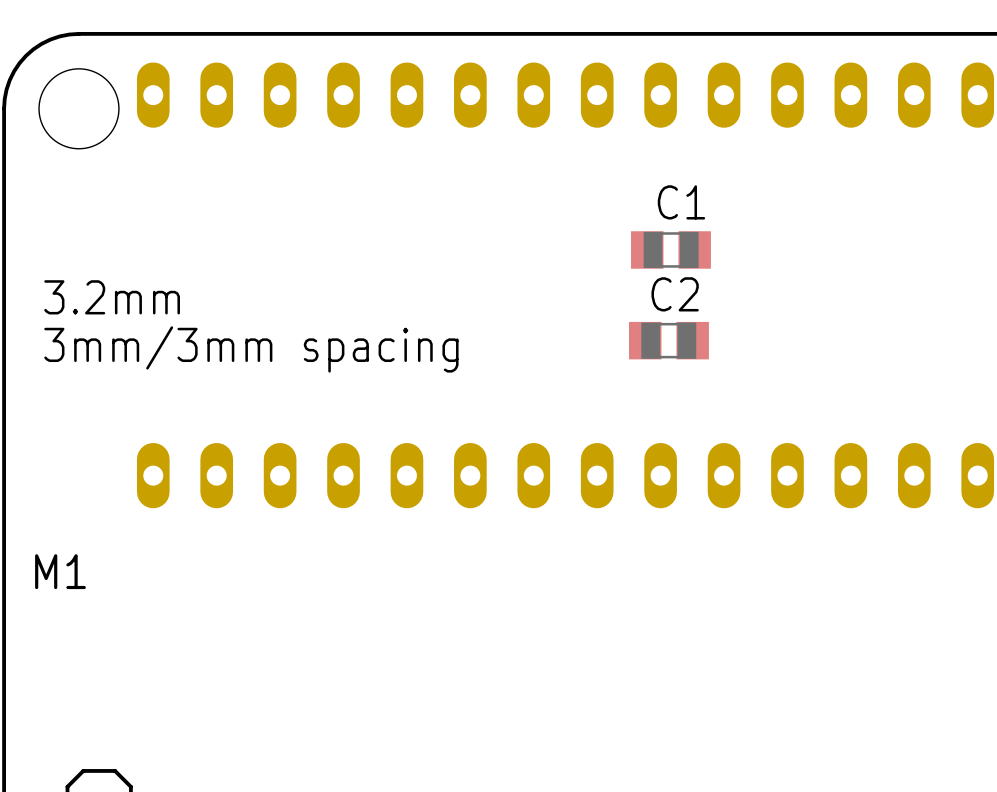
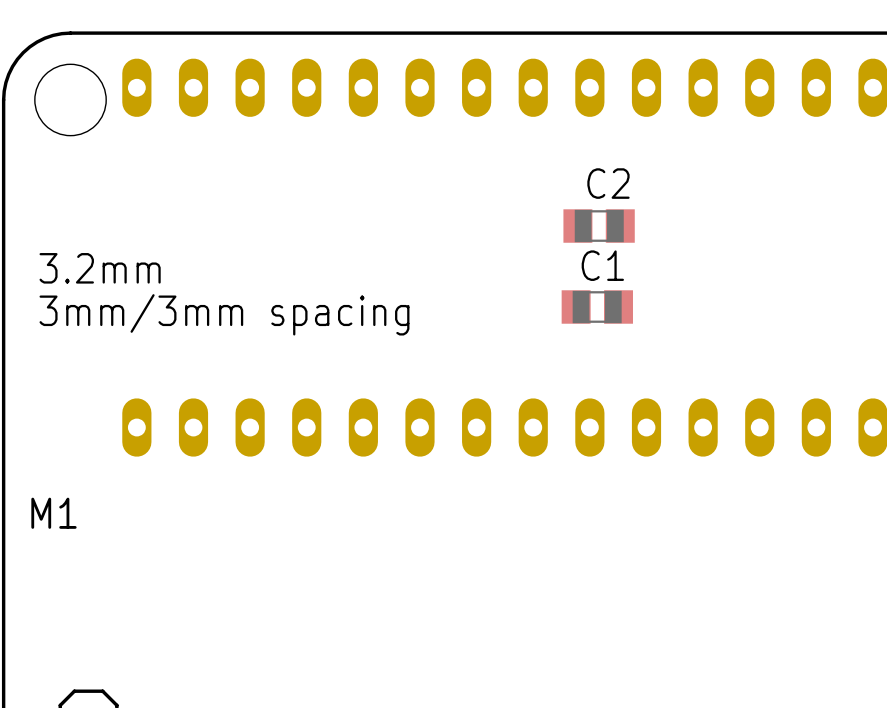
C1 name: C1 (681, 202) -> C2 (608, 183)
C2 name: C2 (675, 294) -> C1 (602, 265)

